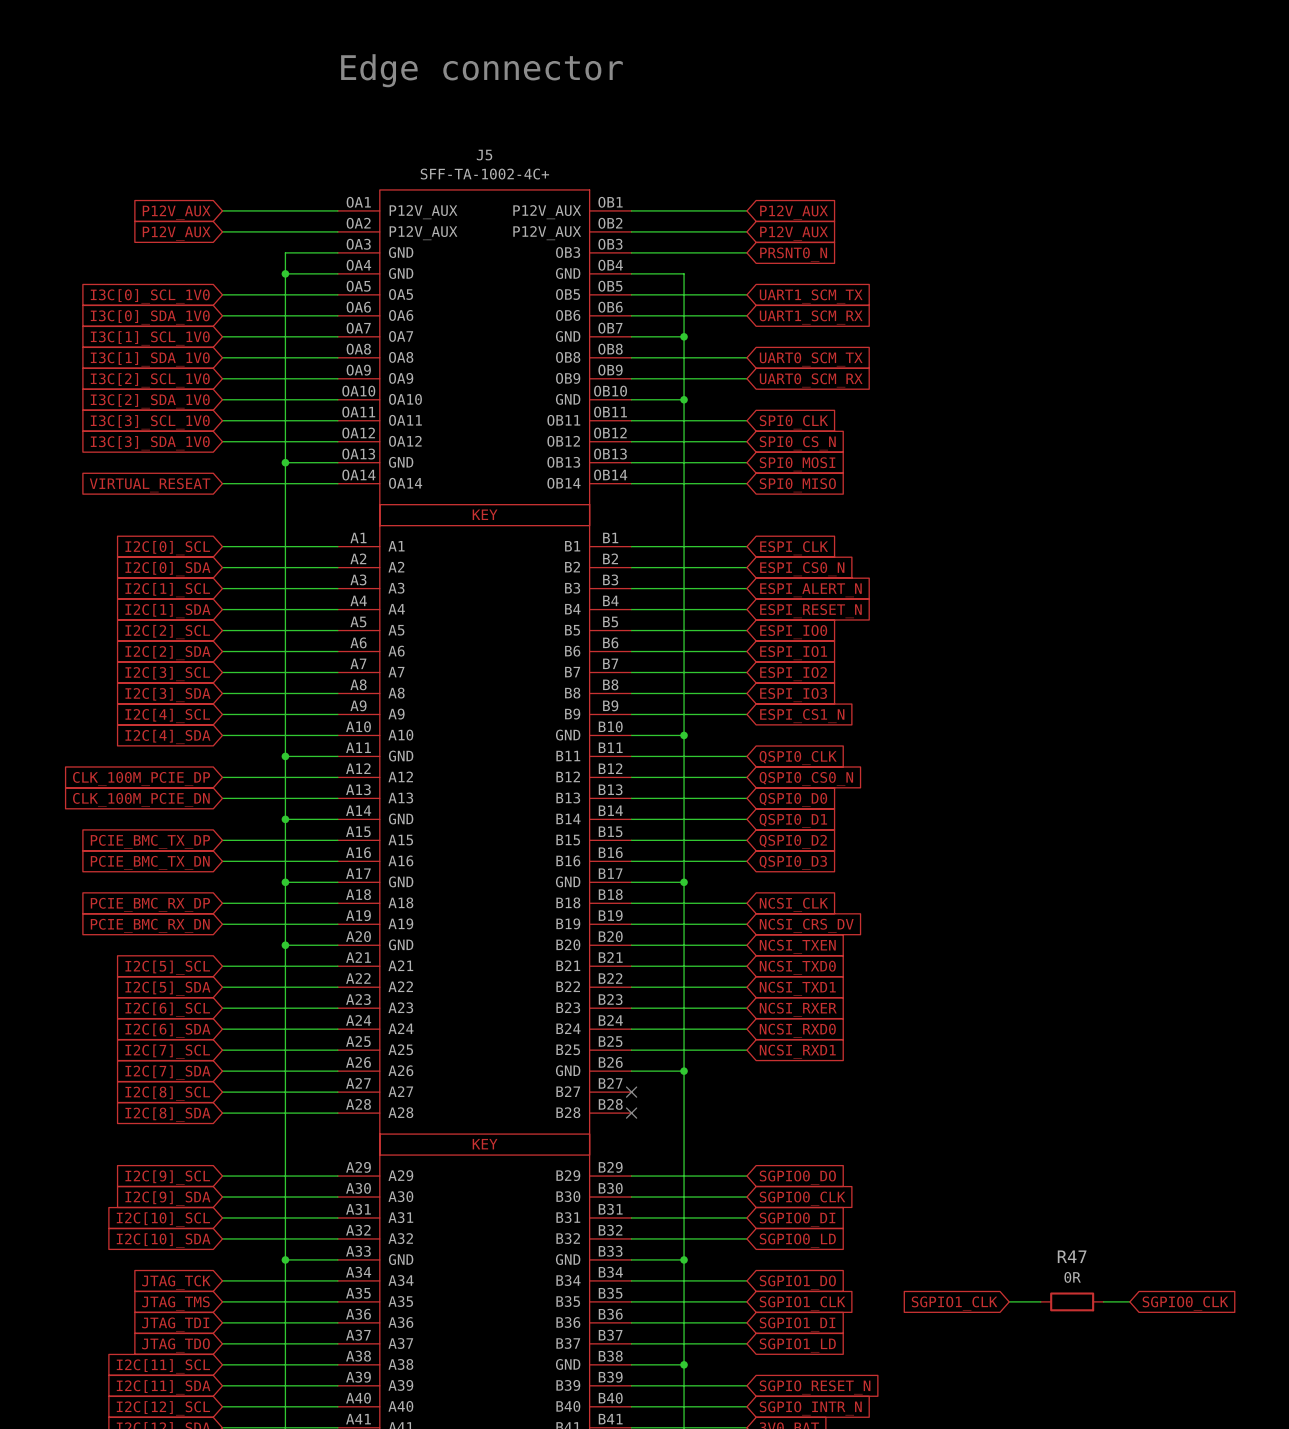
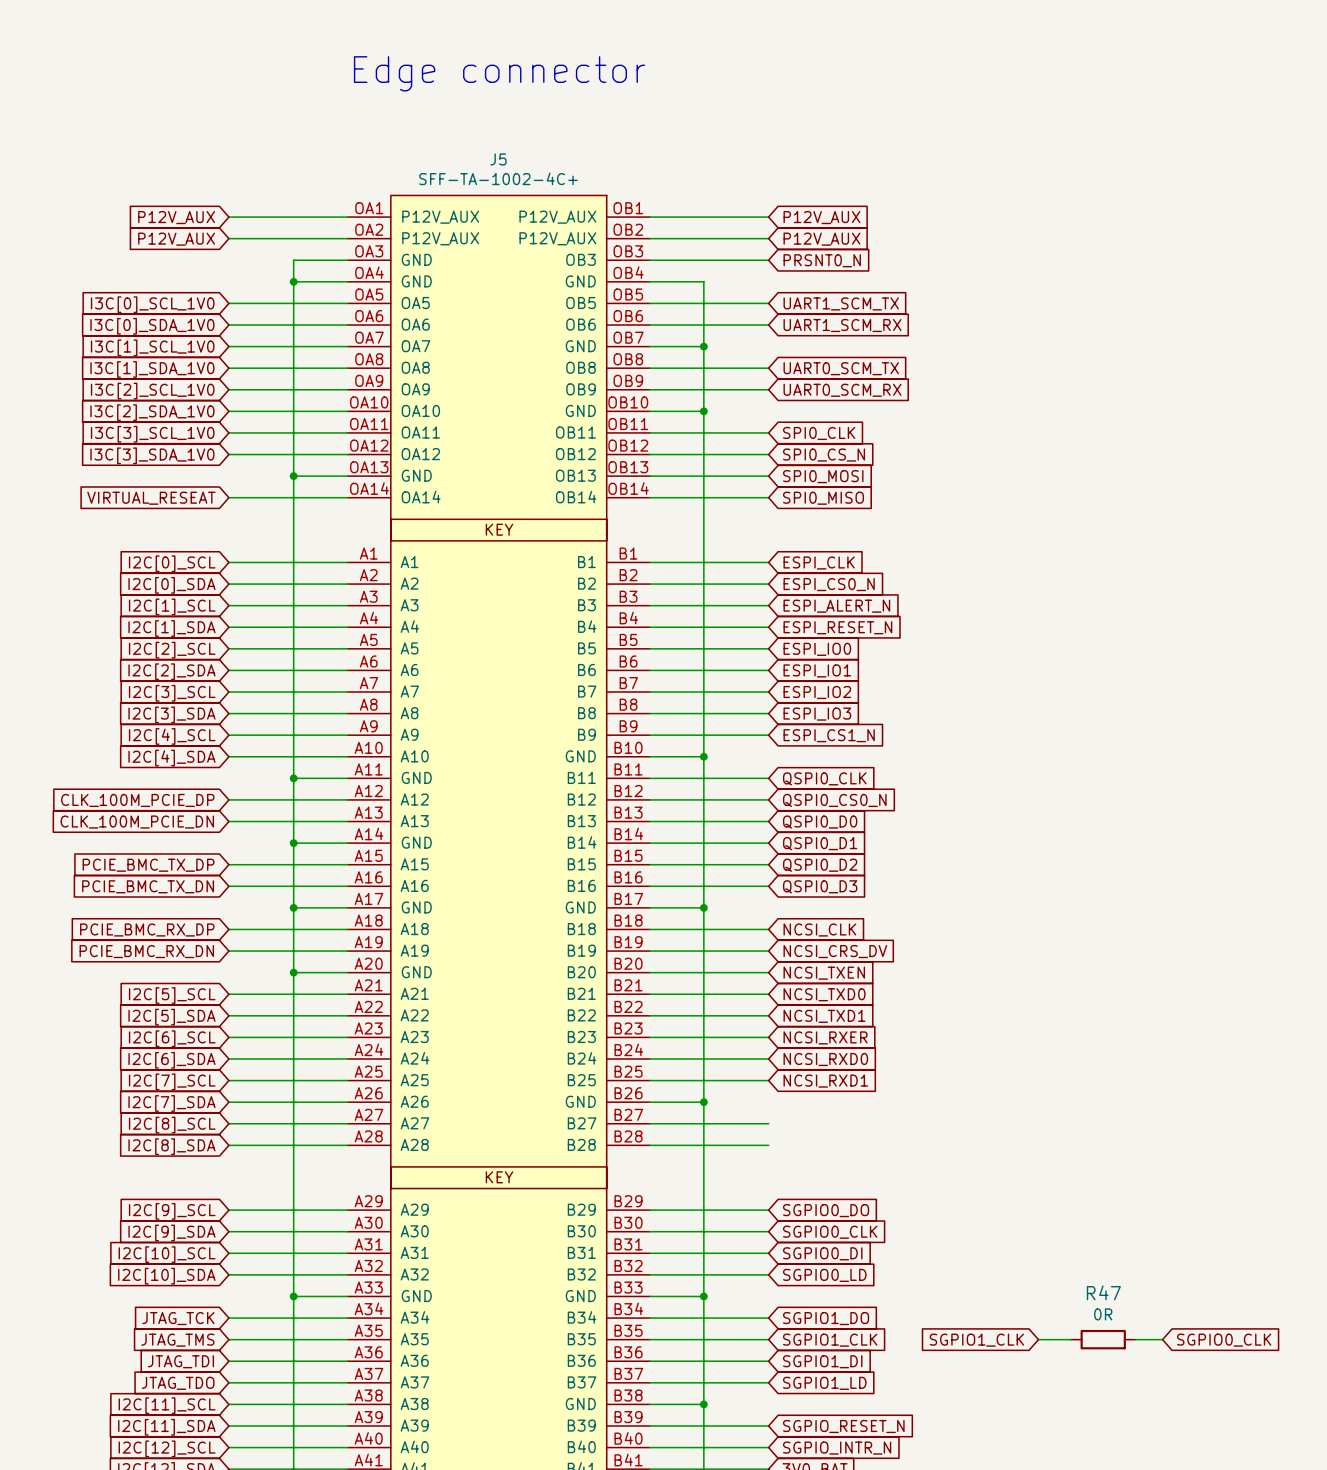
wire: none -> (649, 1123) (768, 1123)
no-connect mark: (631, 1092) -> none
wire: none -> (649, 1145) (768, 1145)
no-connect mark: (631, 1113) -> none

